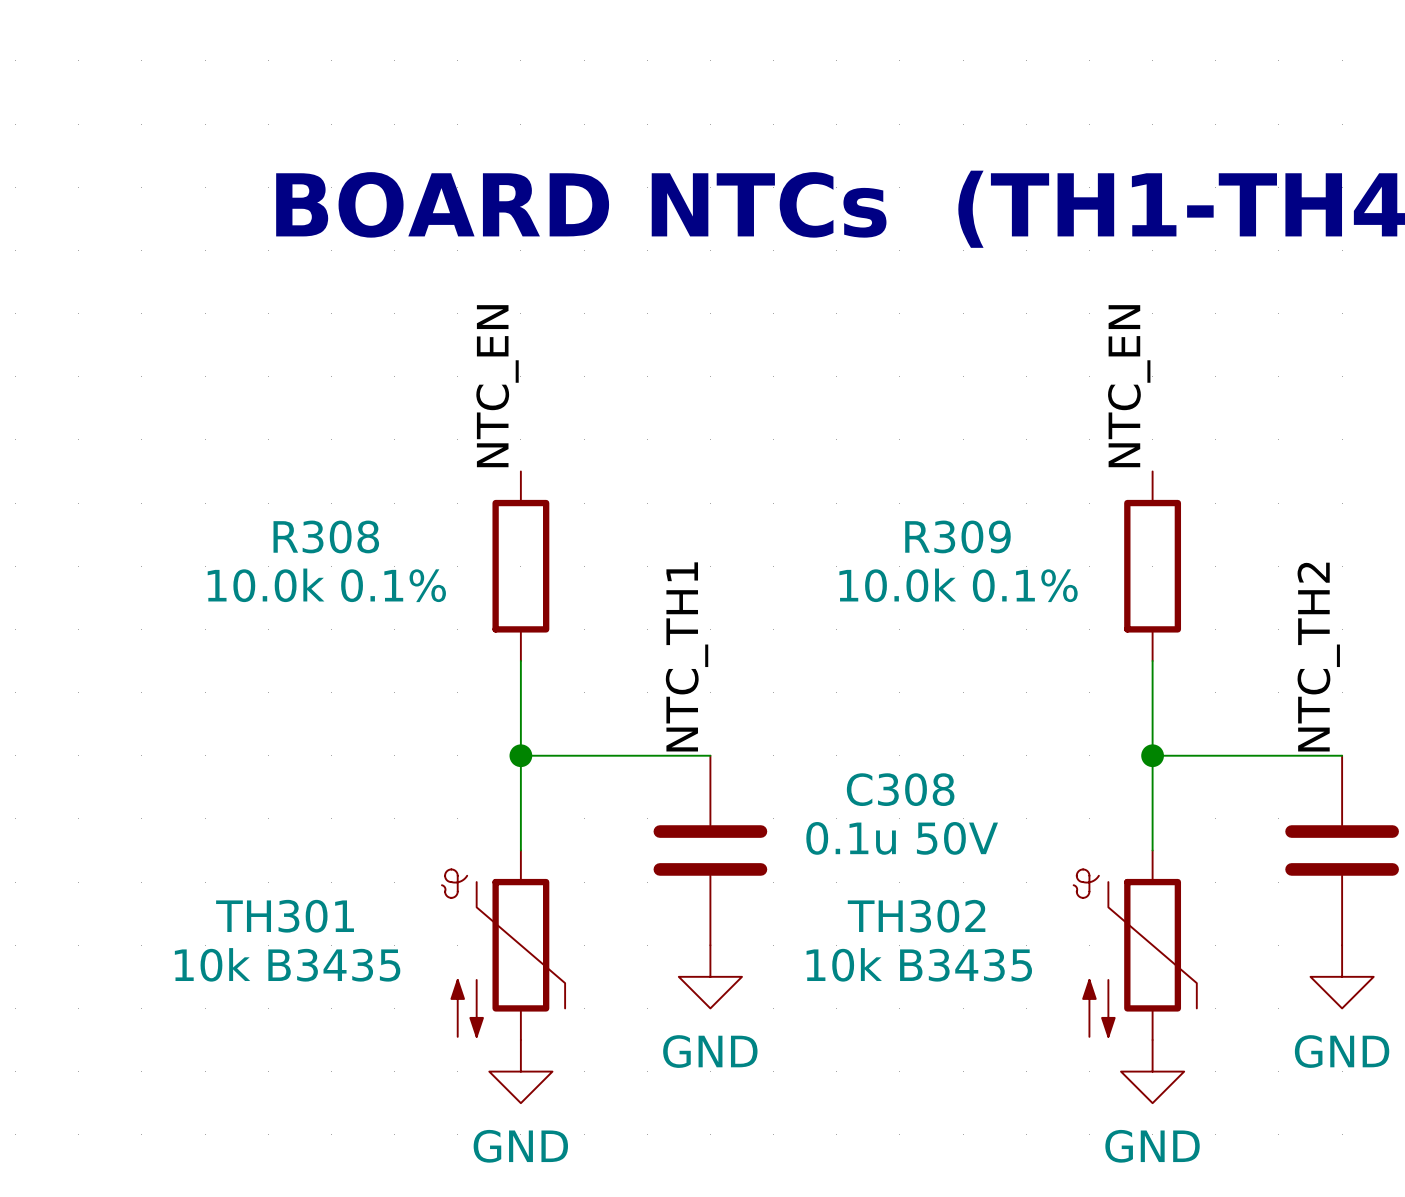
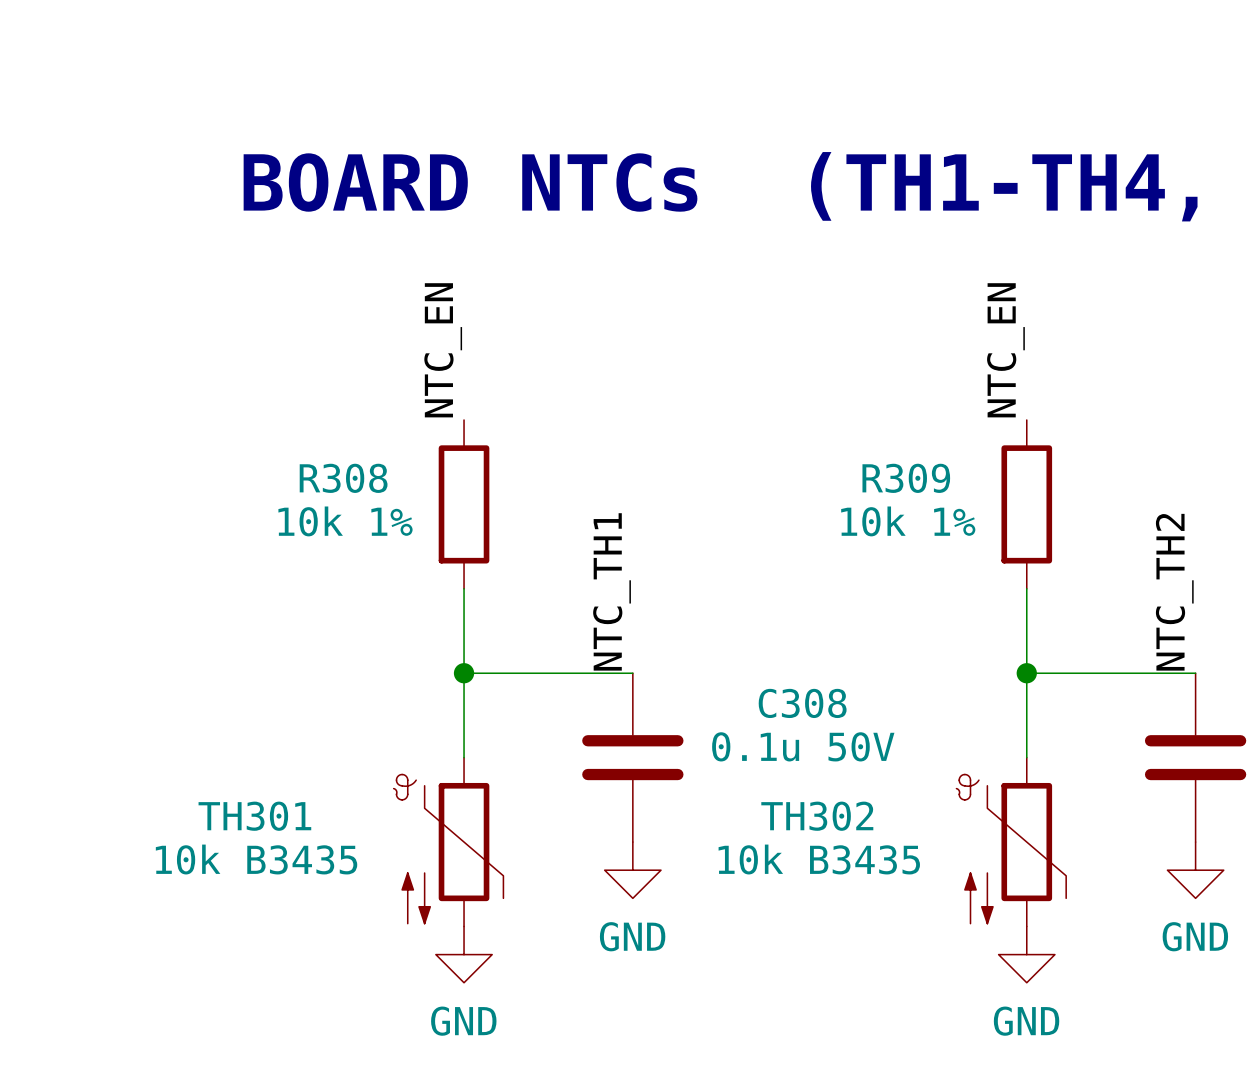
R308 name position: R308 (326, 536) -> R308 (343, 478)
R309 name position: R309 (957, 536) -> R309 (906, 478)
R308 value: 10.0k 0.1% (326, 585) -> 10k 1% (345, 521)
R309 value: 10.0k 0.1% (958, 585) -> 10k 1% (908, 521)

